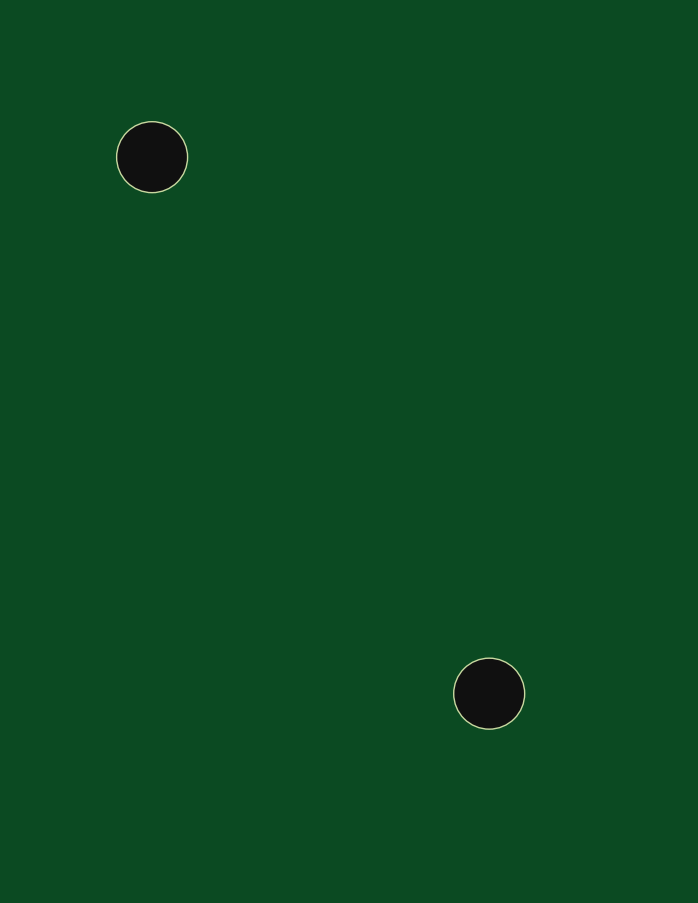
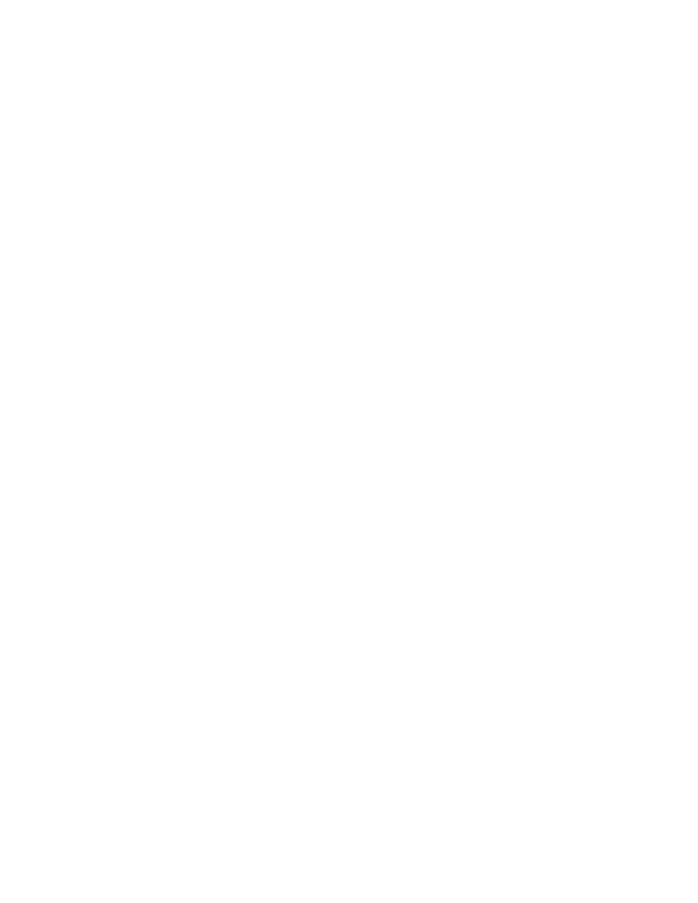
part: (152, 157) -> none
part: (489, 693) -> none

